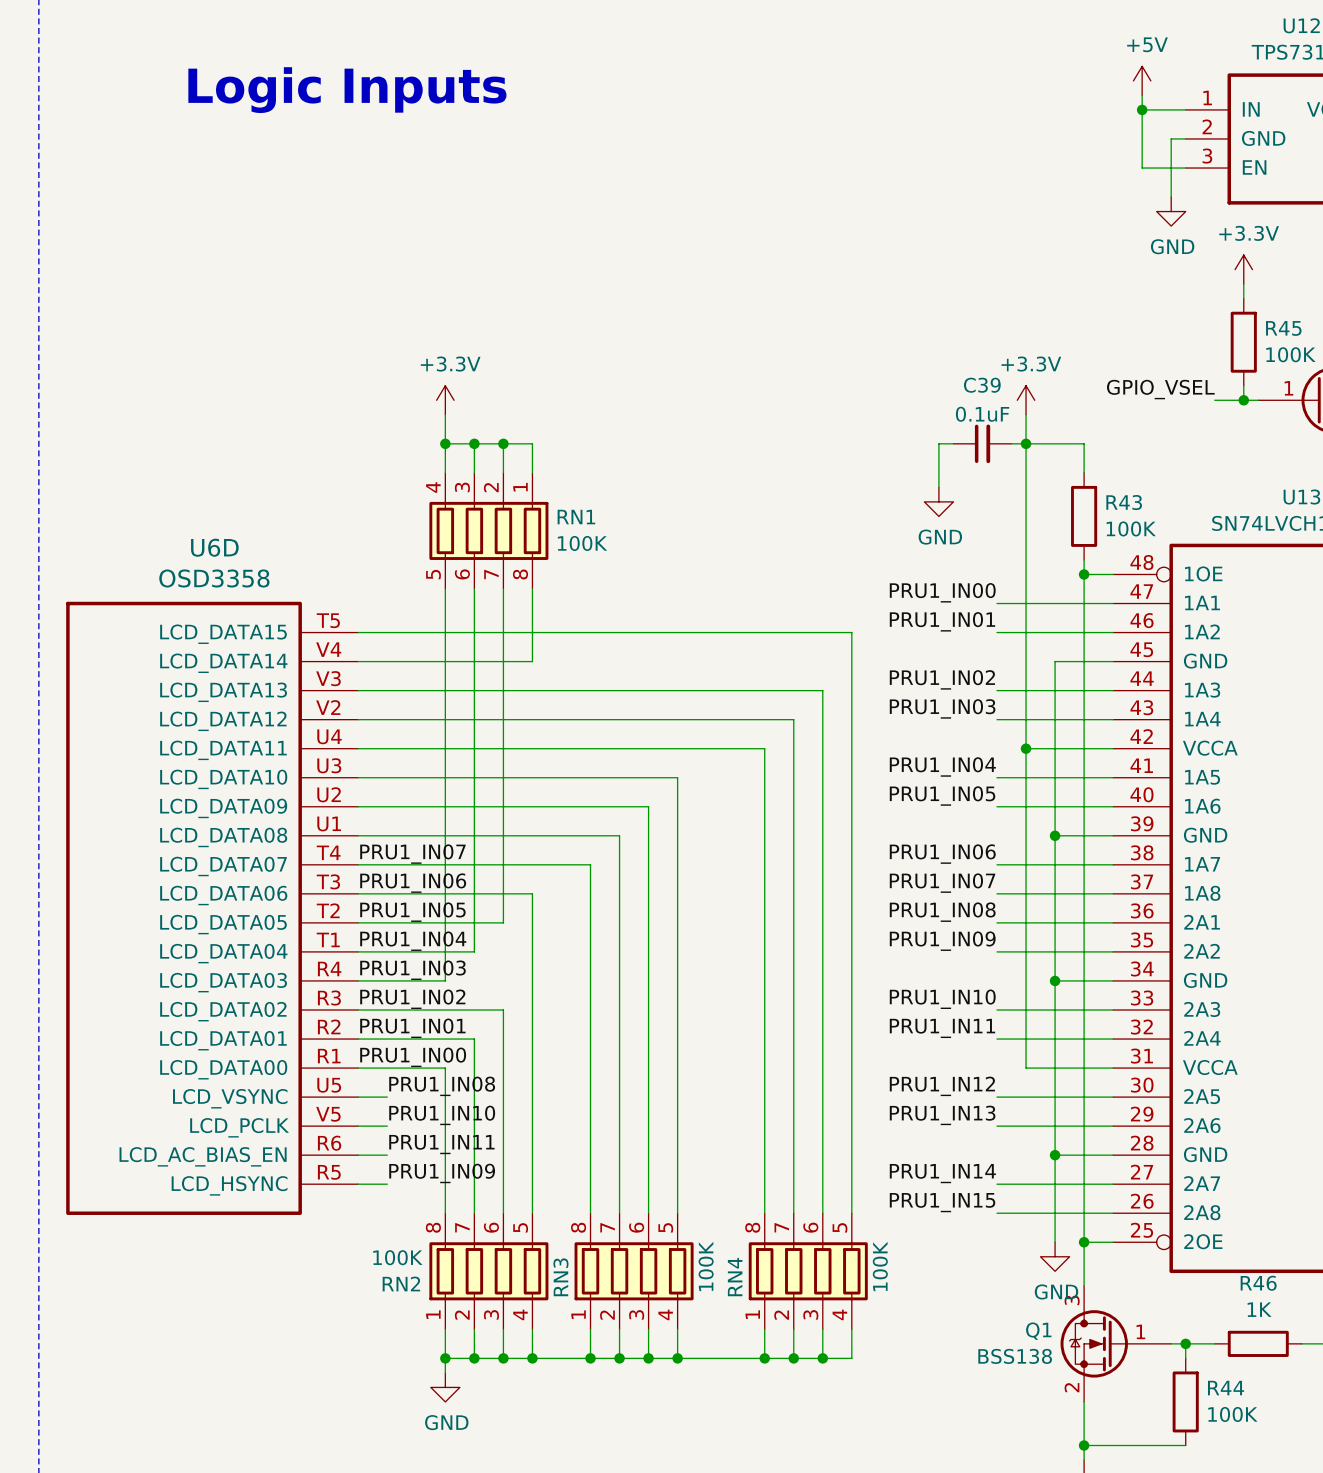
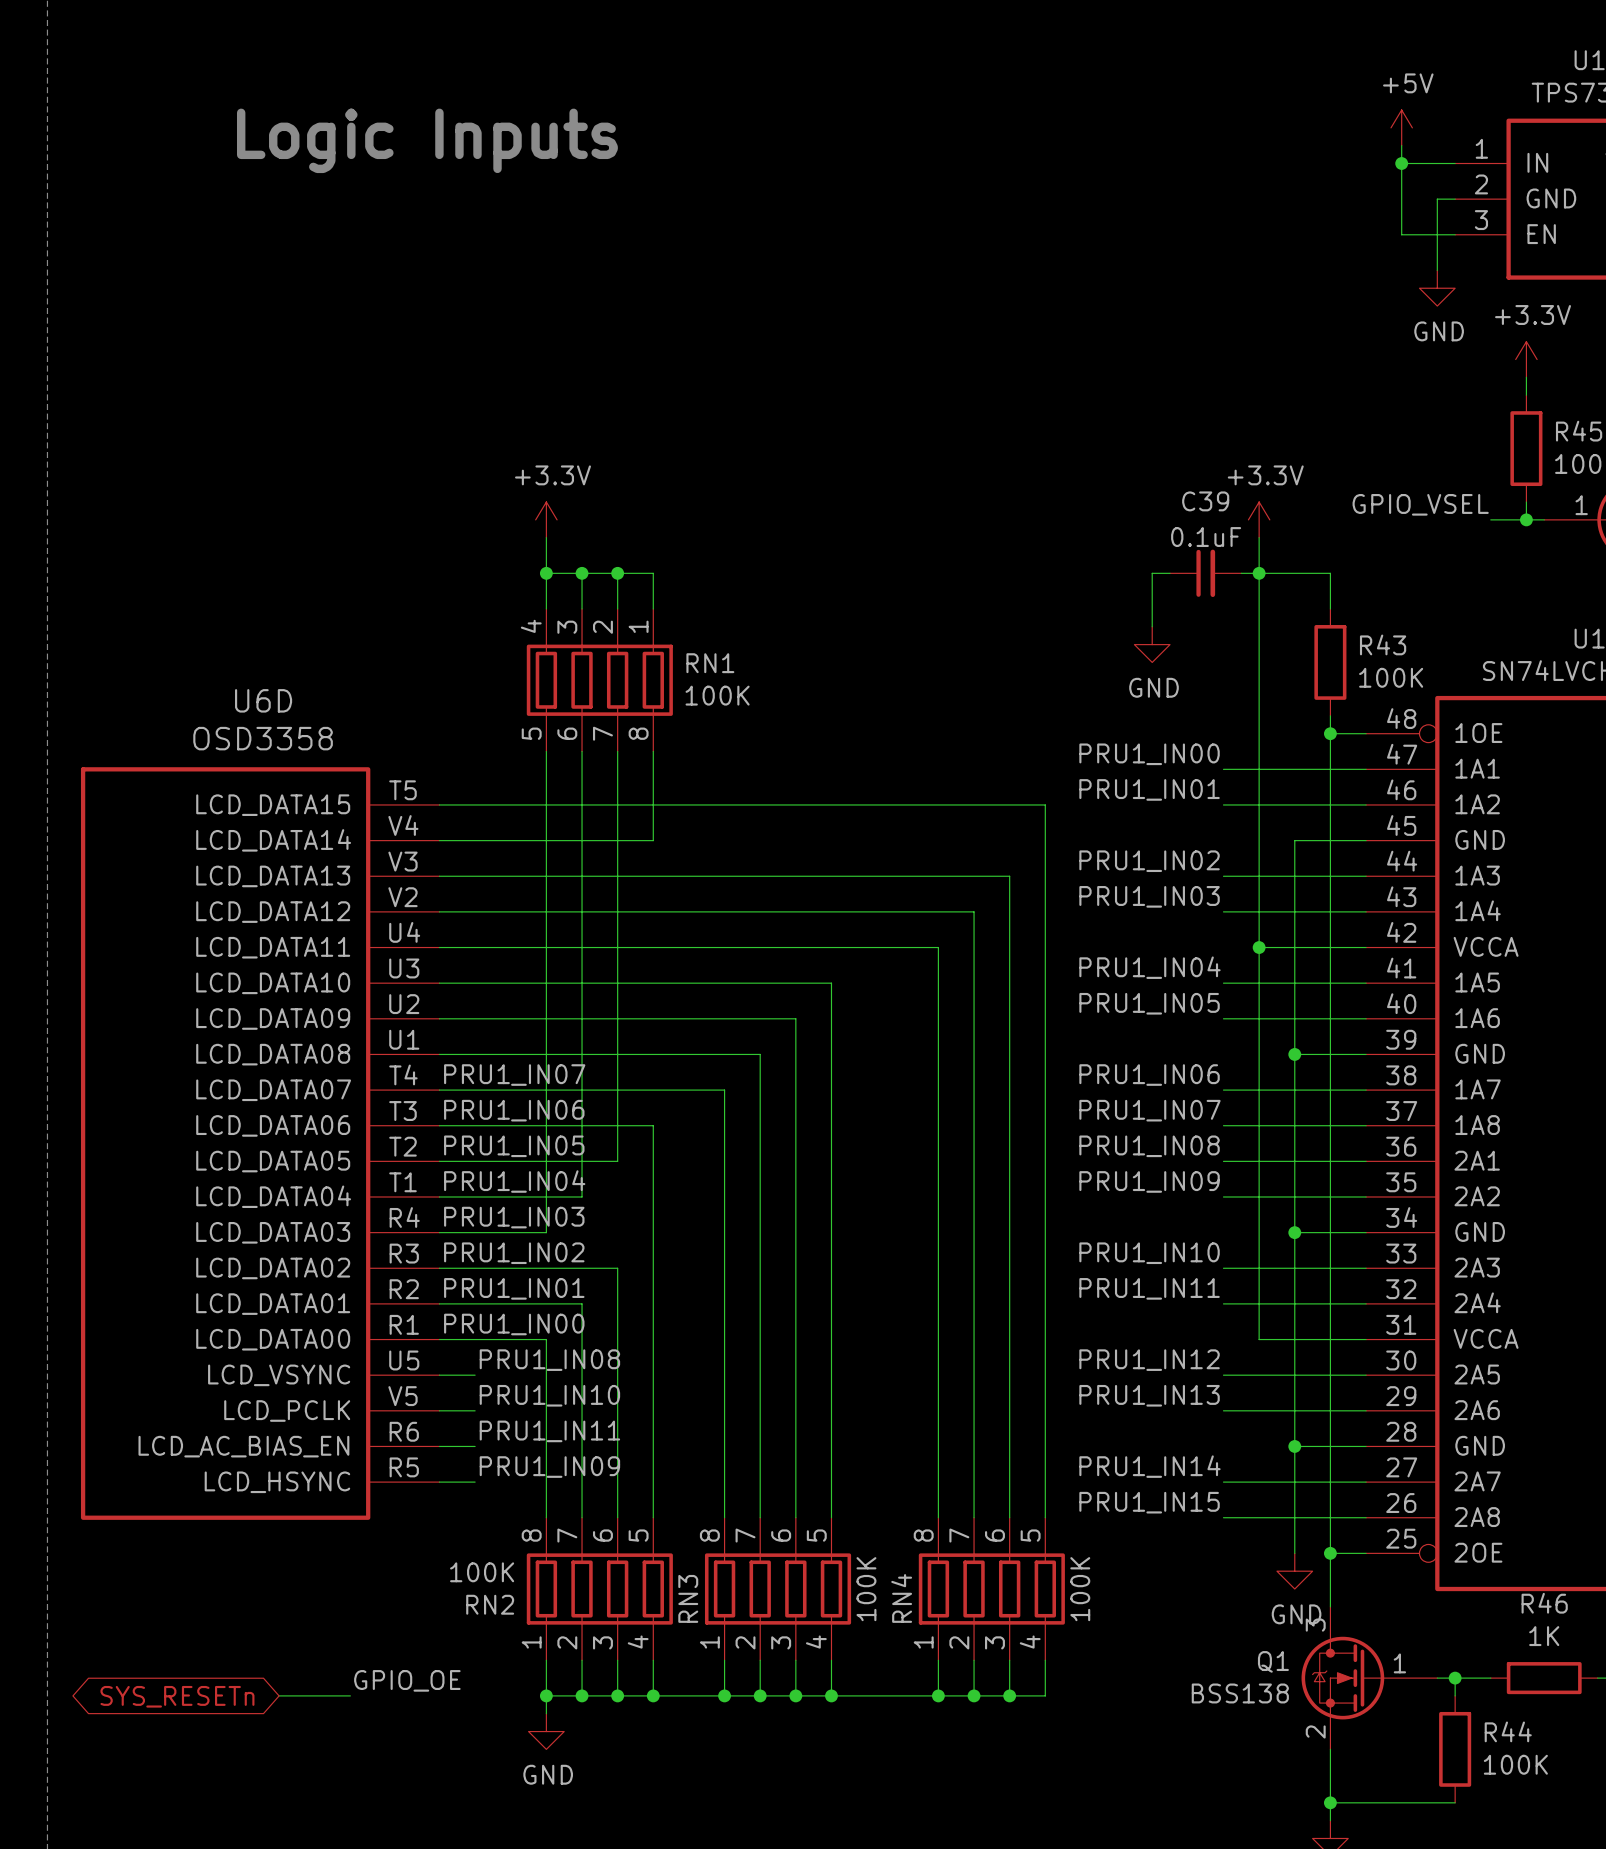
label: none -> GPIO_OE (407, 1680)
wire: none -> (279, 1695) (350, 1695)
global label: none -> SYS_RESETn (177, 1696)

